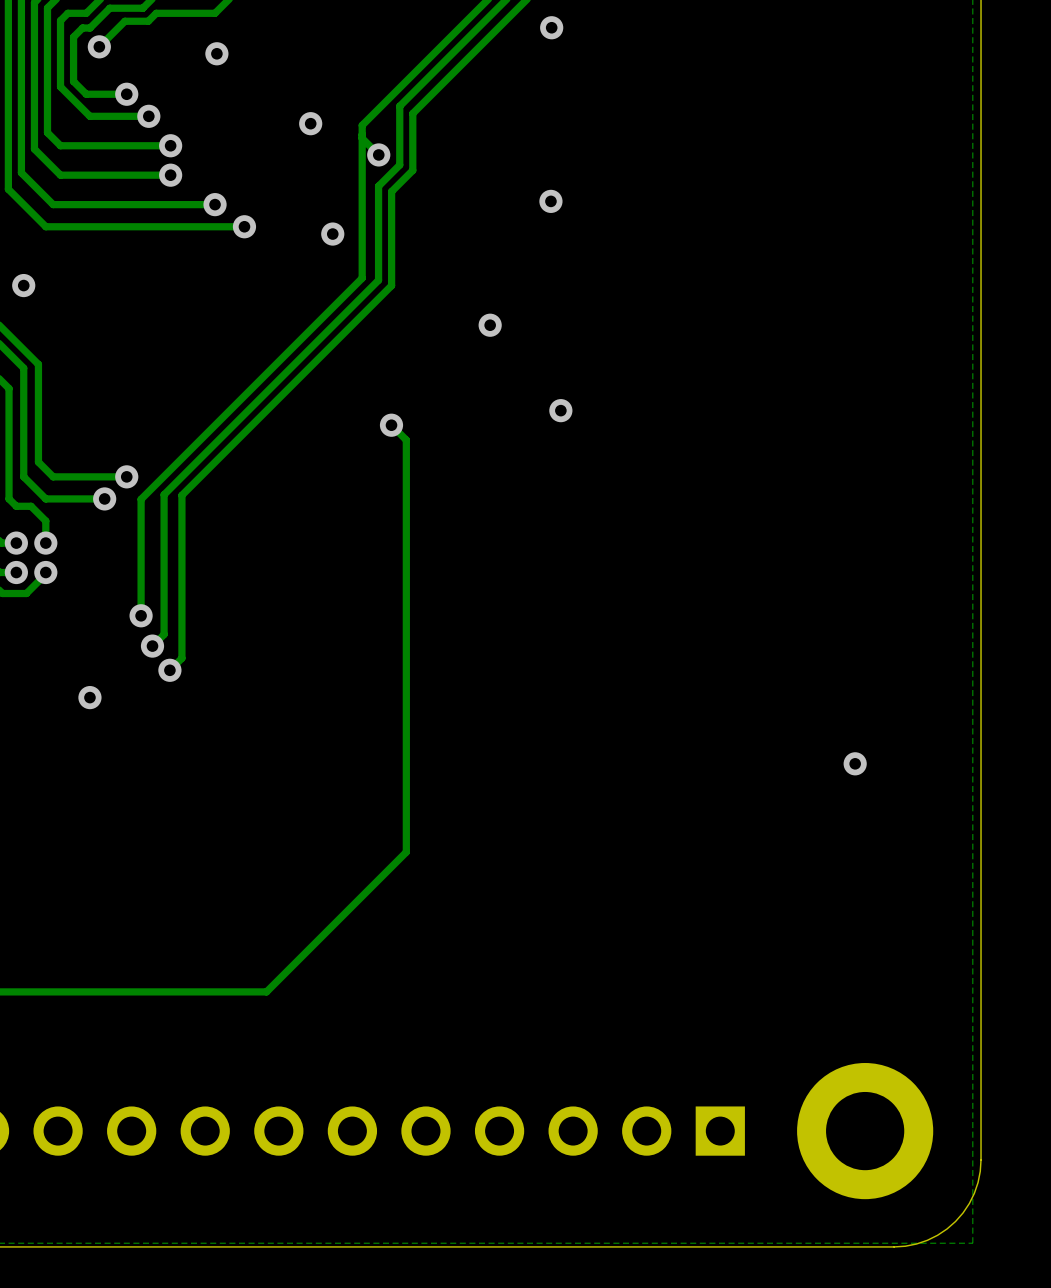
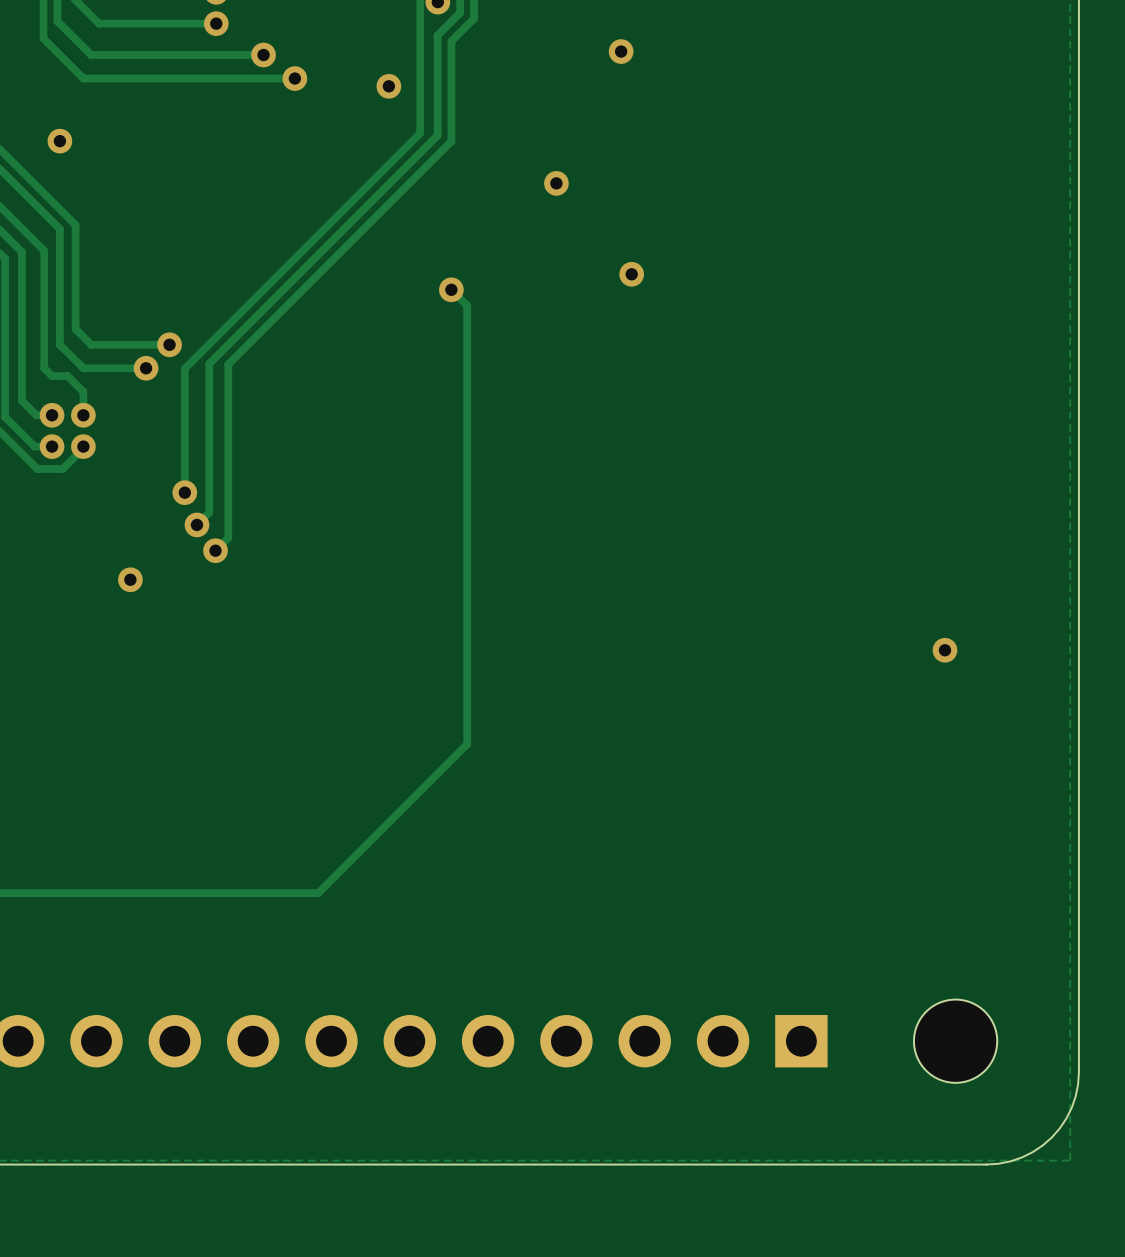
part footprint: [797, 1063, 934, 1200] -> [913, 999, 998, 1083]

